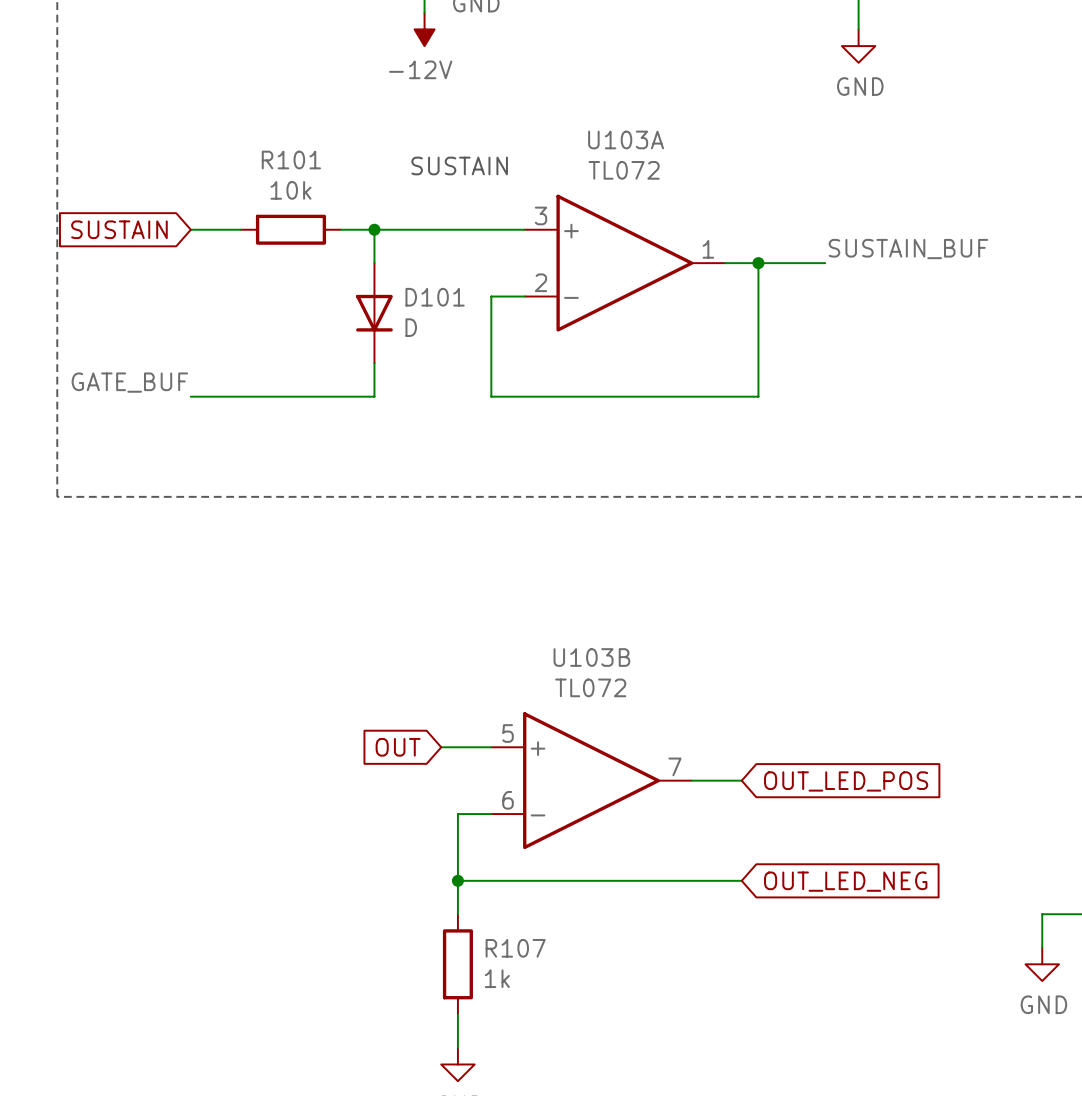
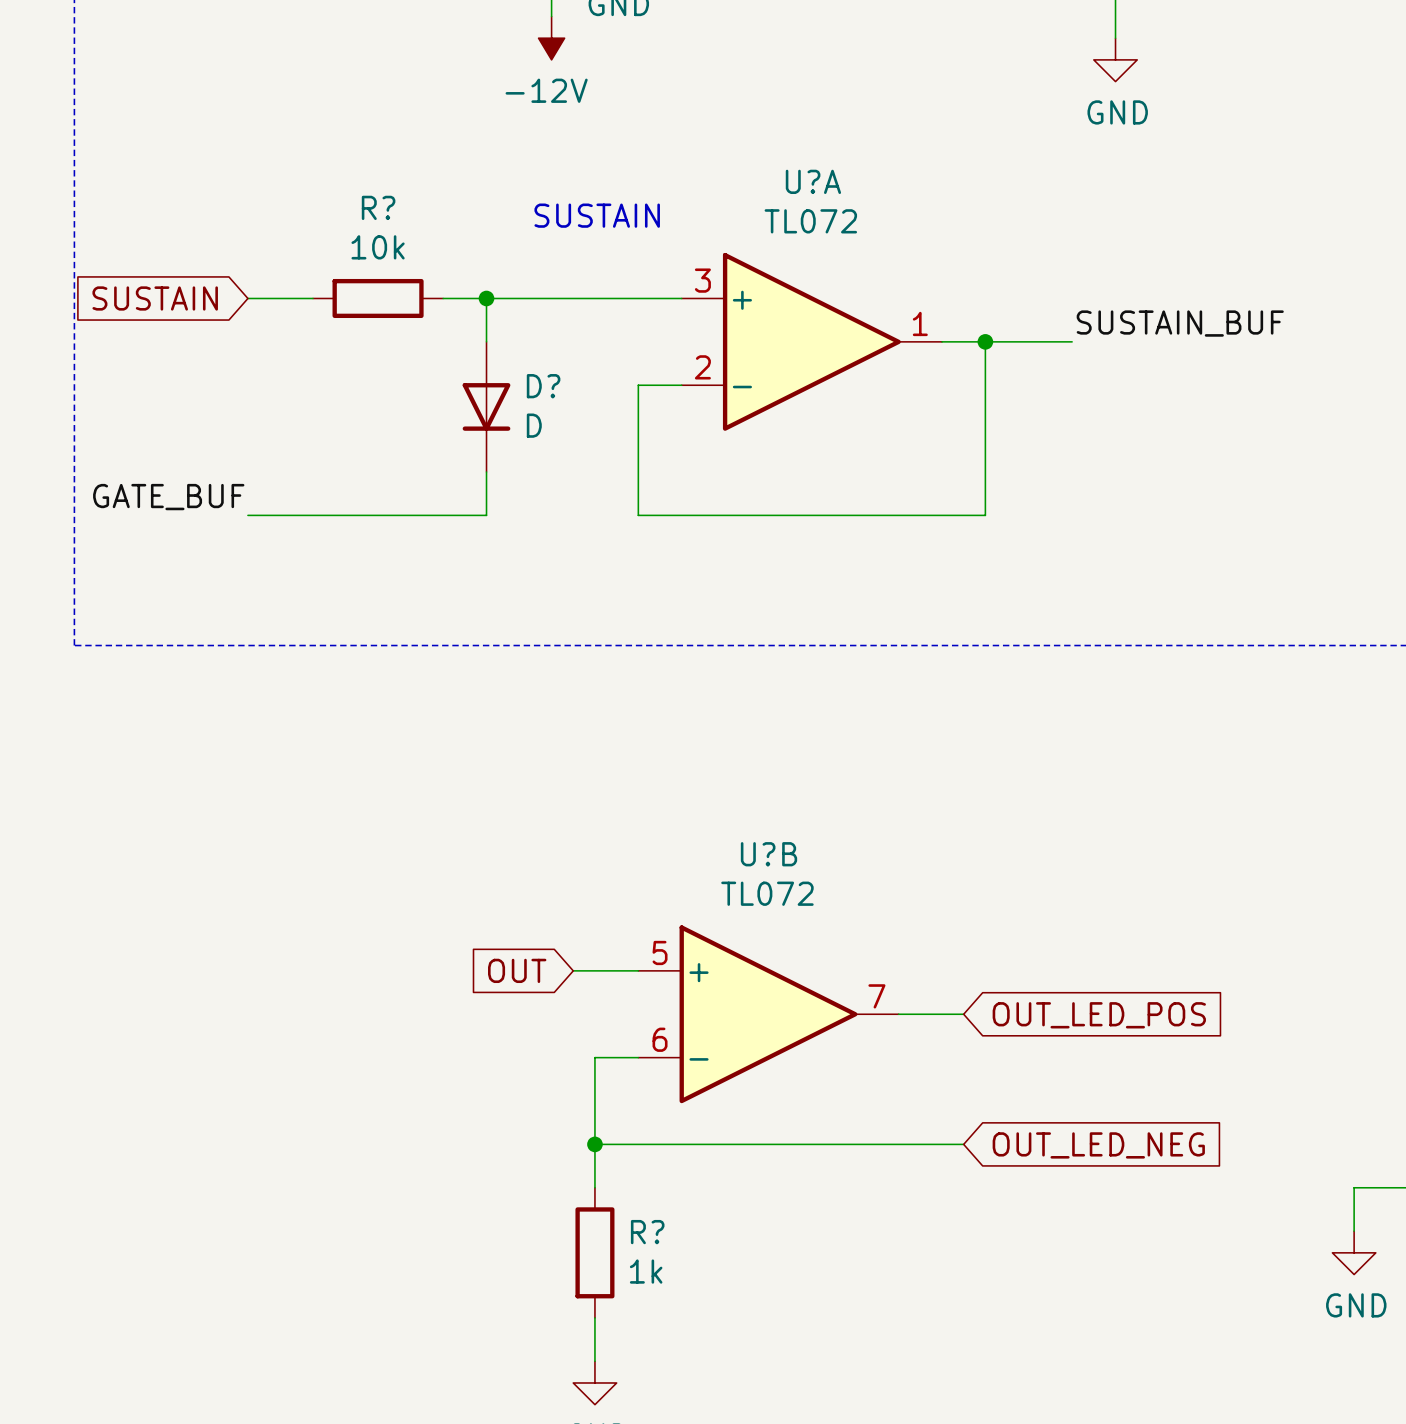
U103A name: U103A (626, 139) -> U?A (813, 181)
R101 name: R101 (291, 160) -> R? (378, 207)
D101 name: D101 (435, 297) -> D? (543, 386)
U103B name: U103B (591, 657) -> U?B (769, 854)
R107 name: R107 (515, 948) -> R? (647, 1232)

